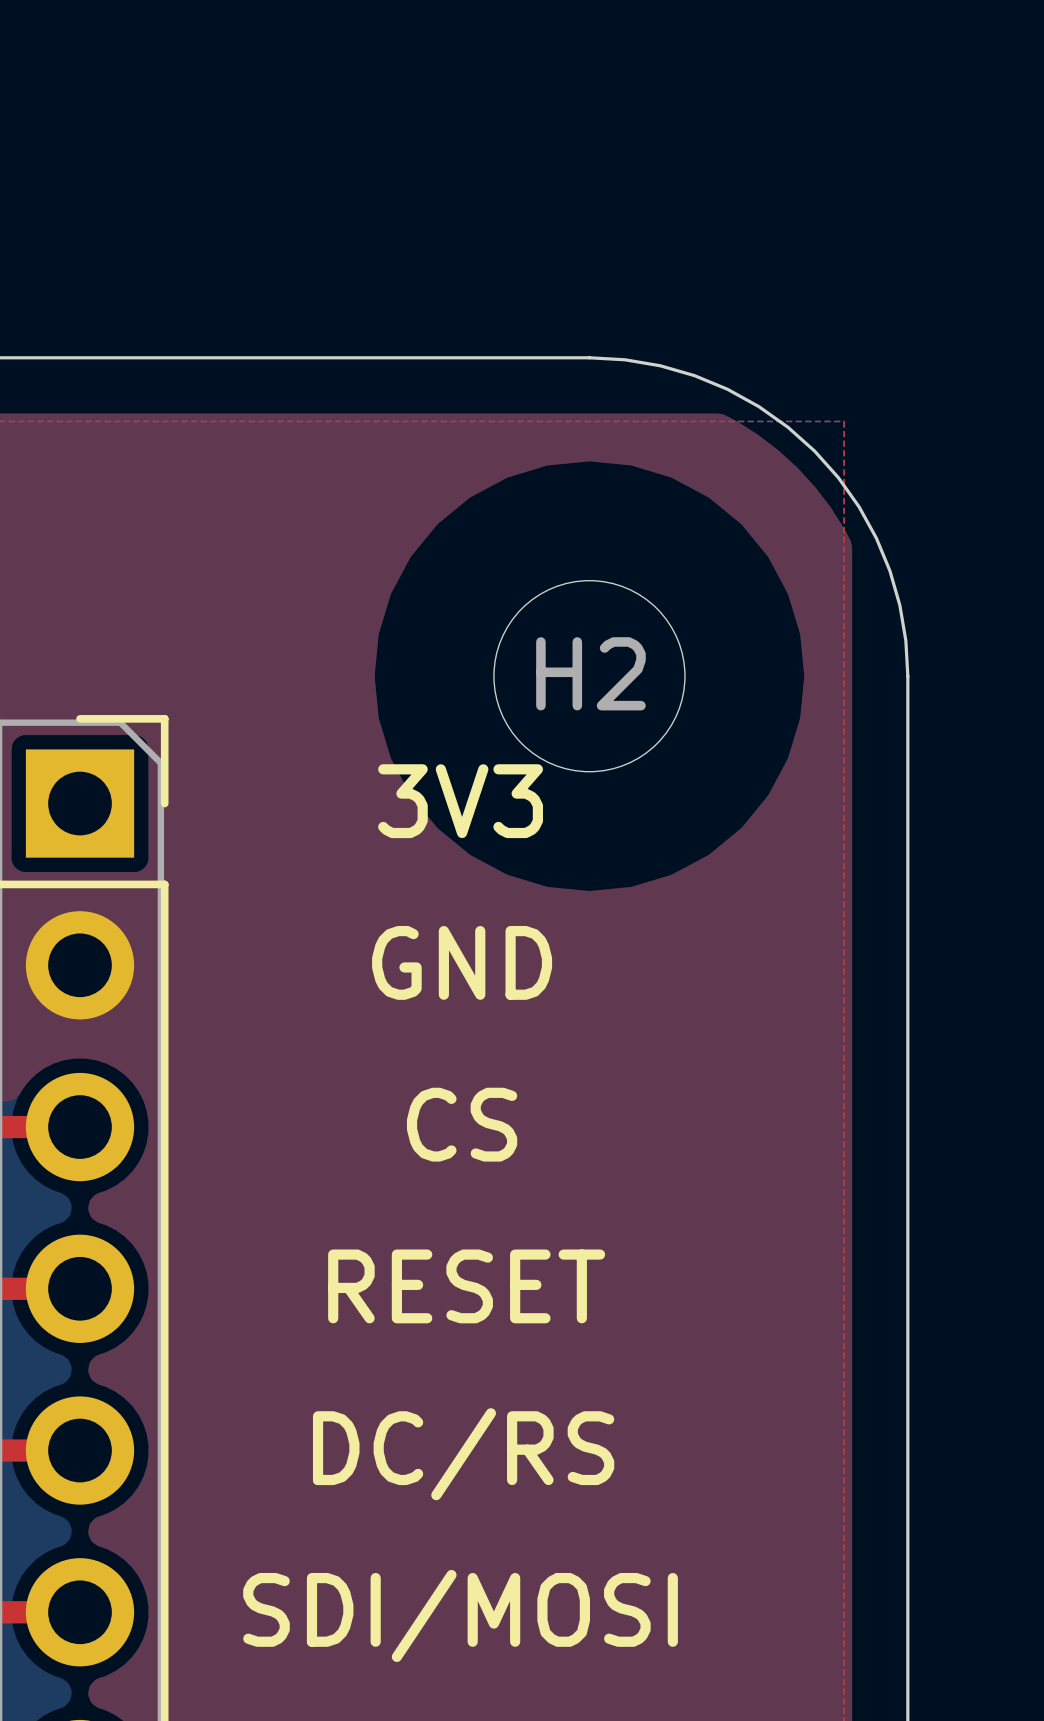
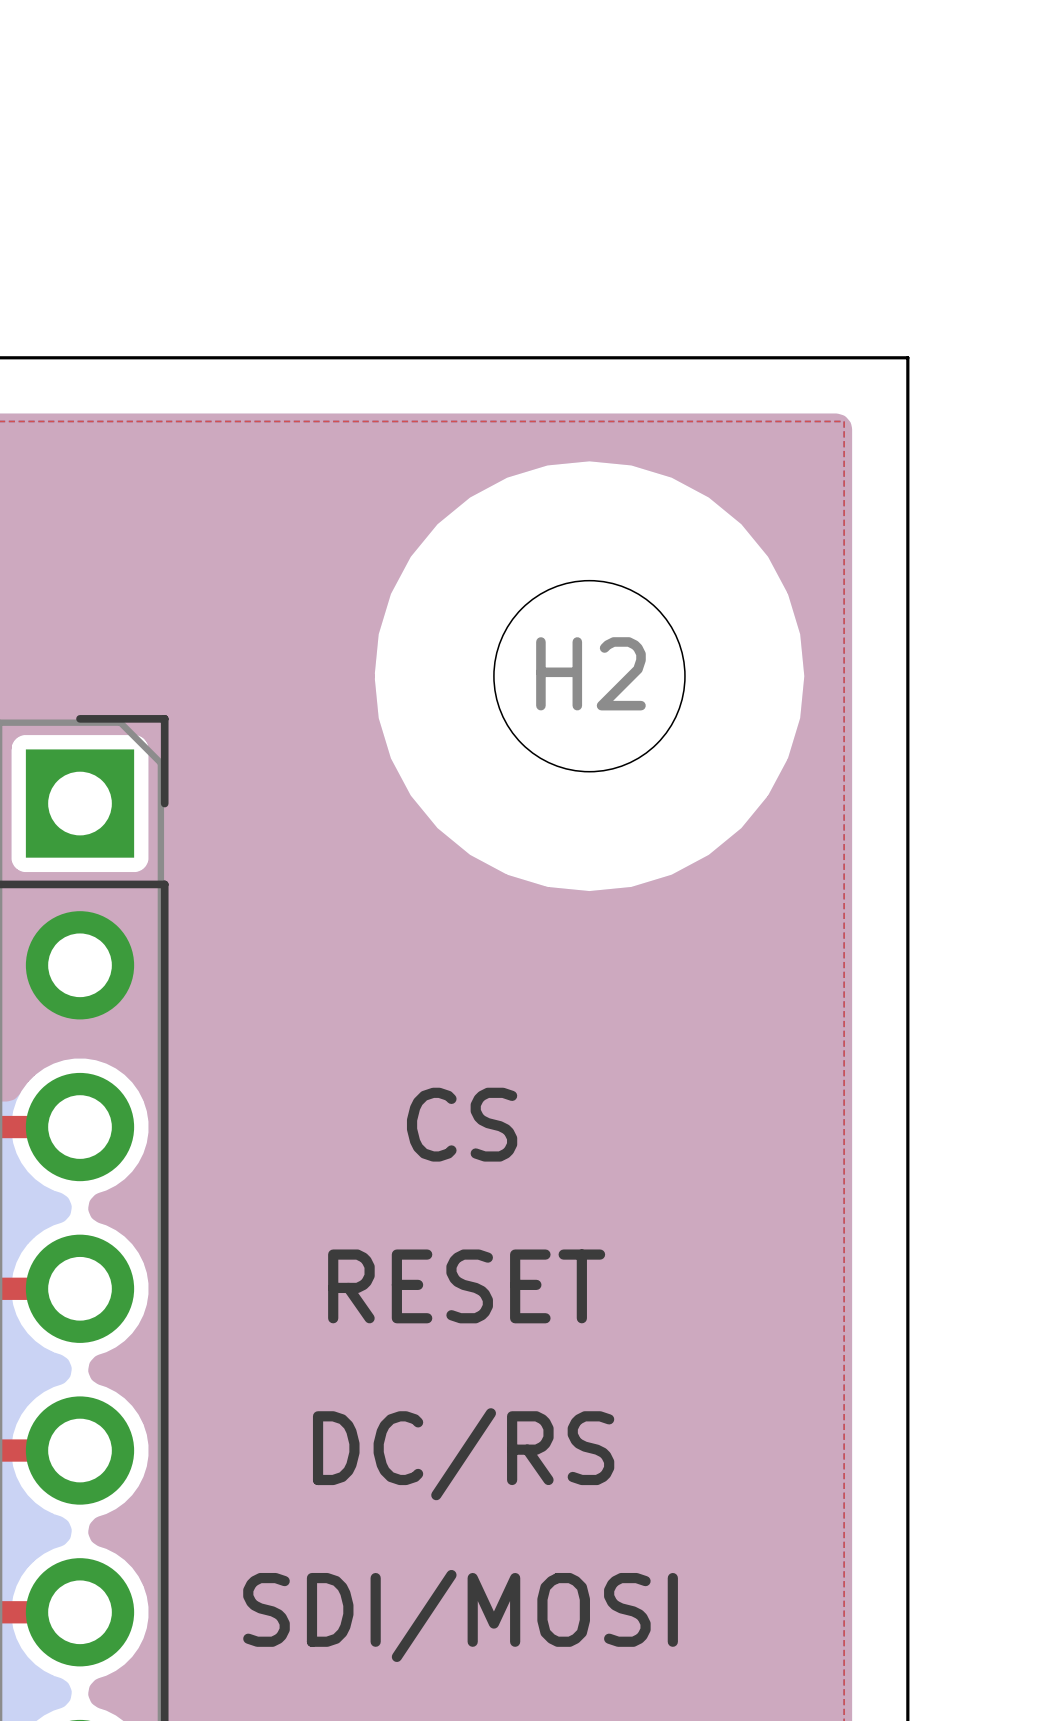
board edge: (589, 357) (625, 359) (660, 365) (694, 375) (727, 389) (758, 406) (787, 427) (814, 451) (838, 477) (859, 506) (876, 538) (889, 571) (899, 605) (905, 640) (907, 676) -> (589, 357) (907, 357) (907, 676)
text: 3V3 (460, 801) -> none
text: GND (462, 962) -> none

